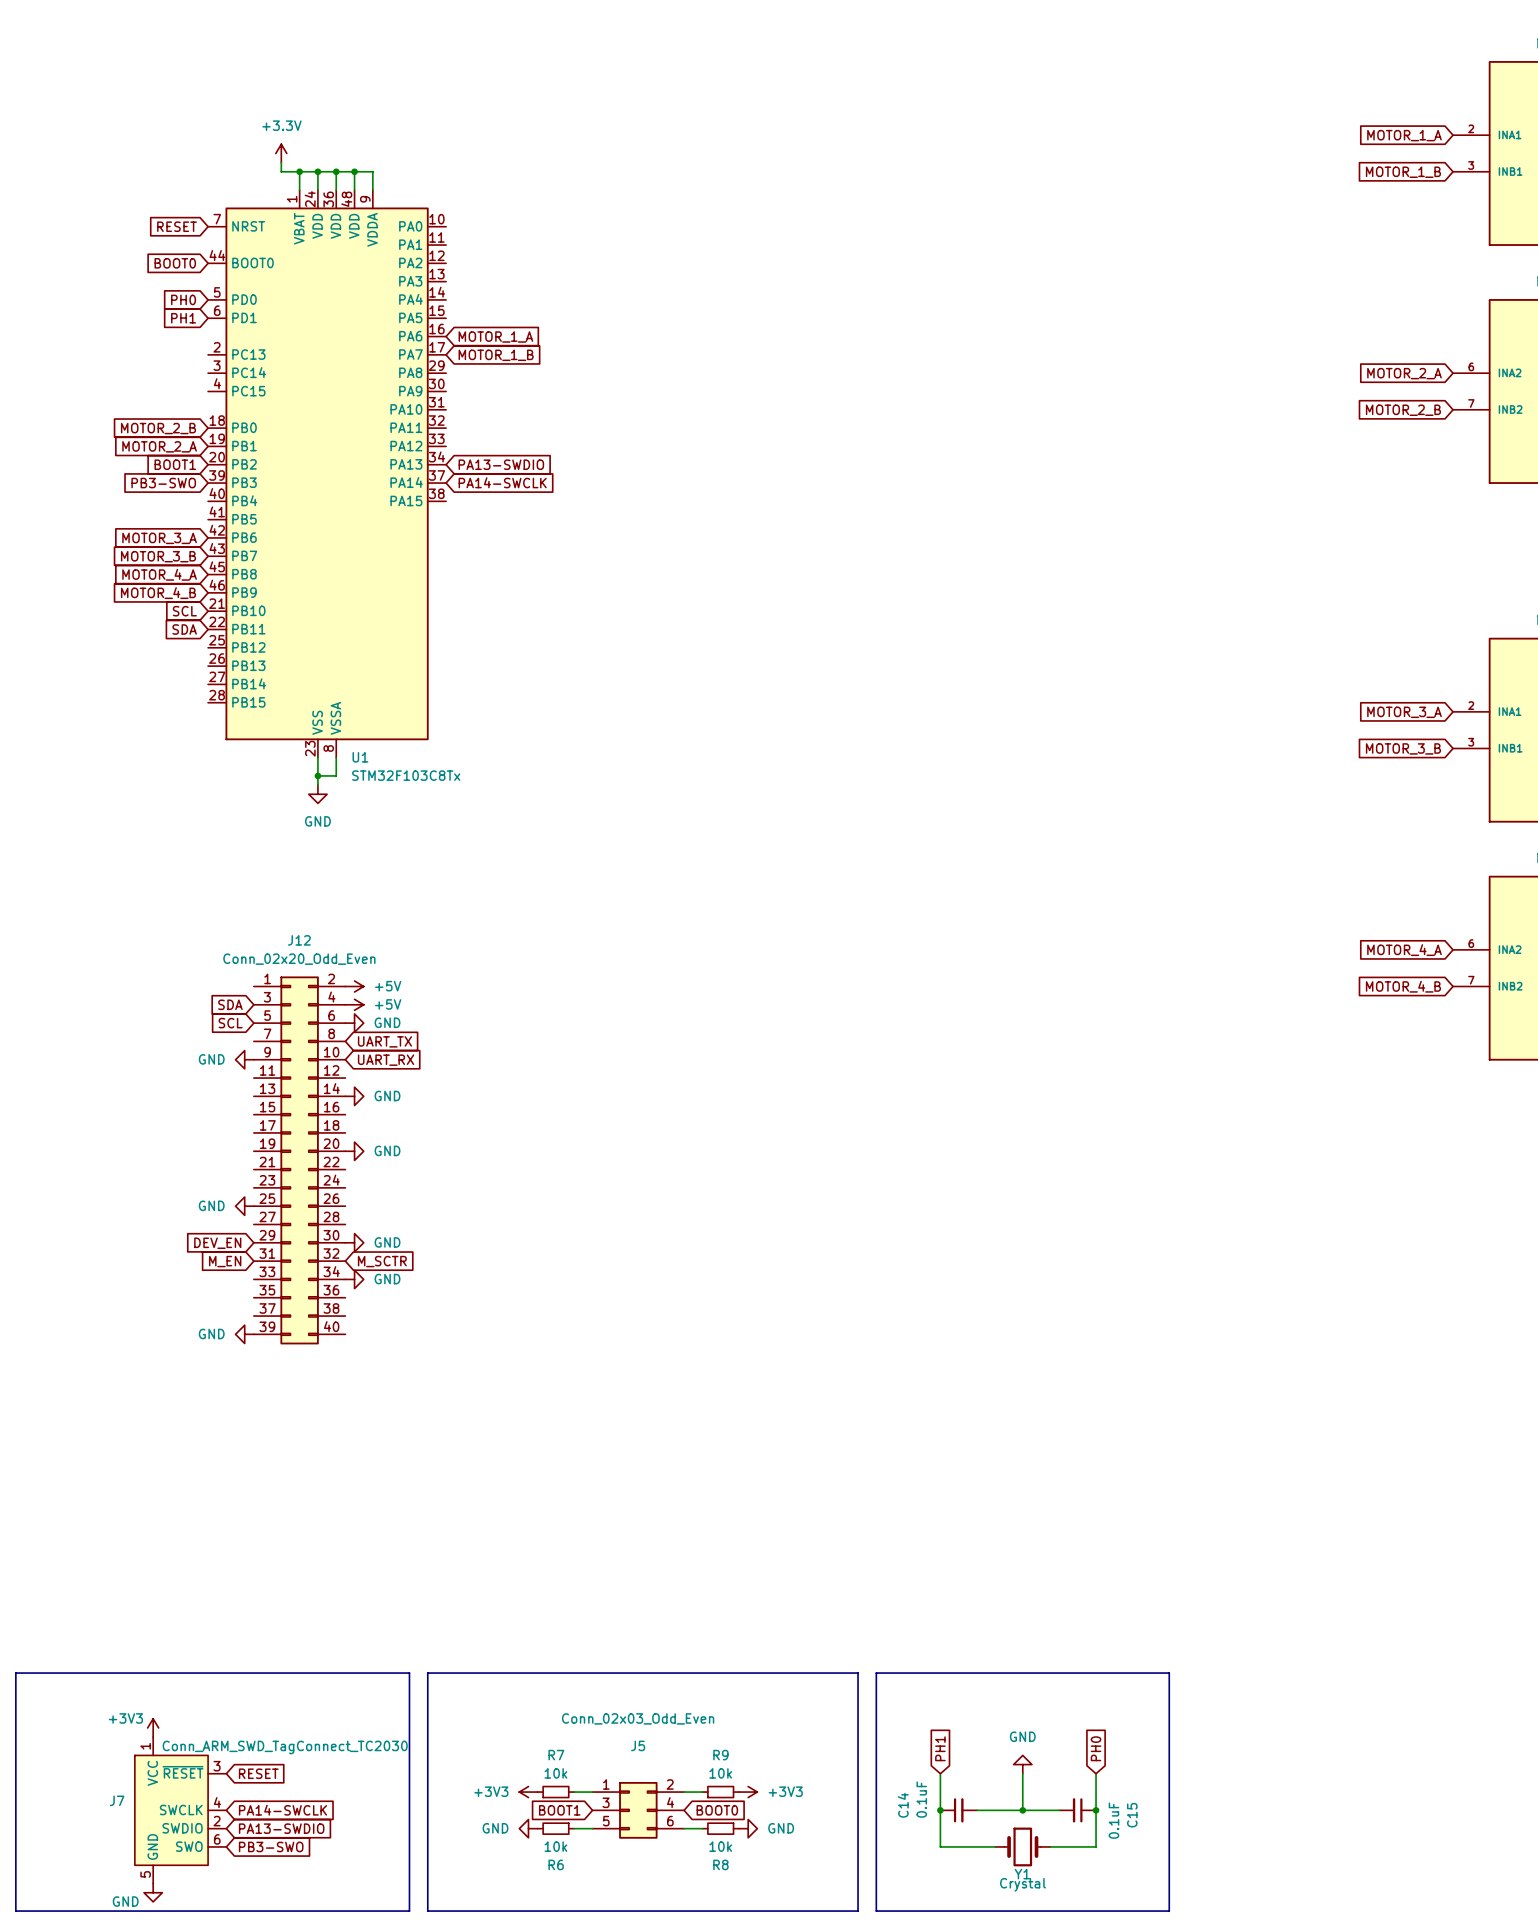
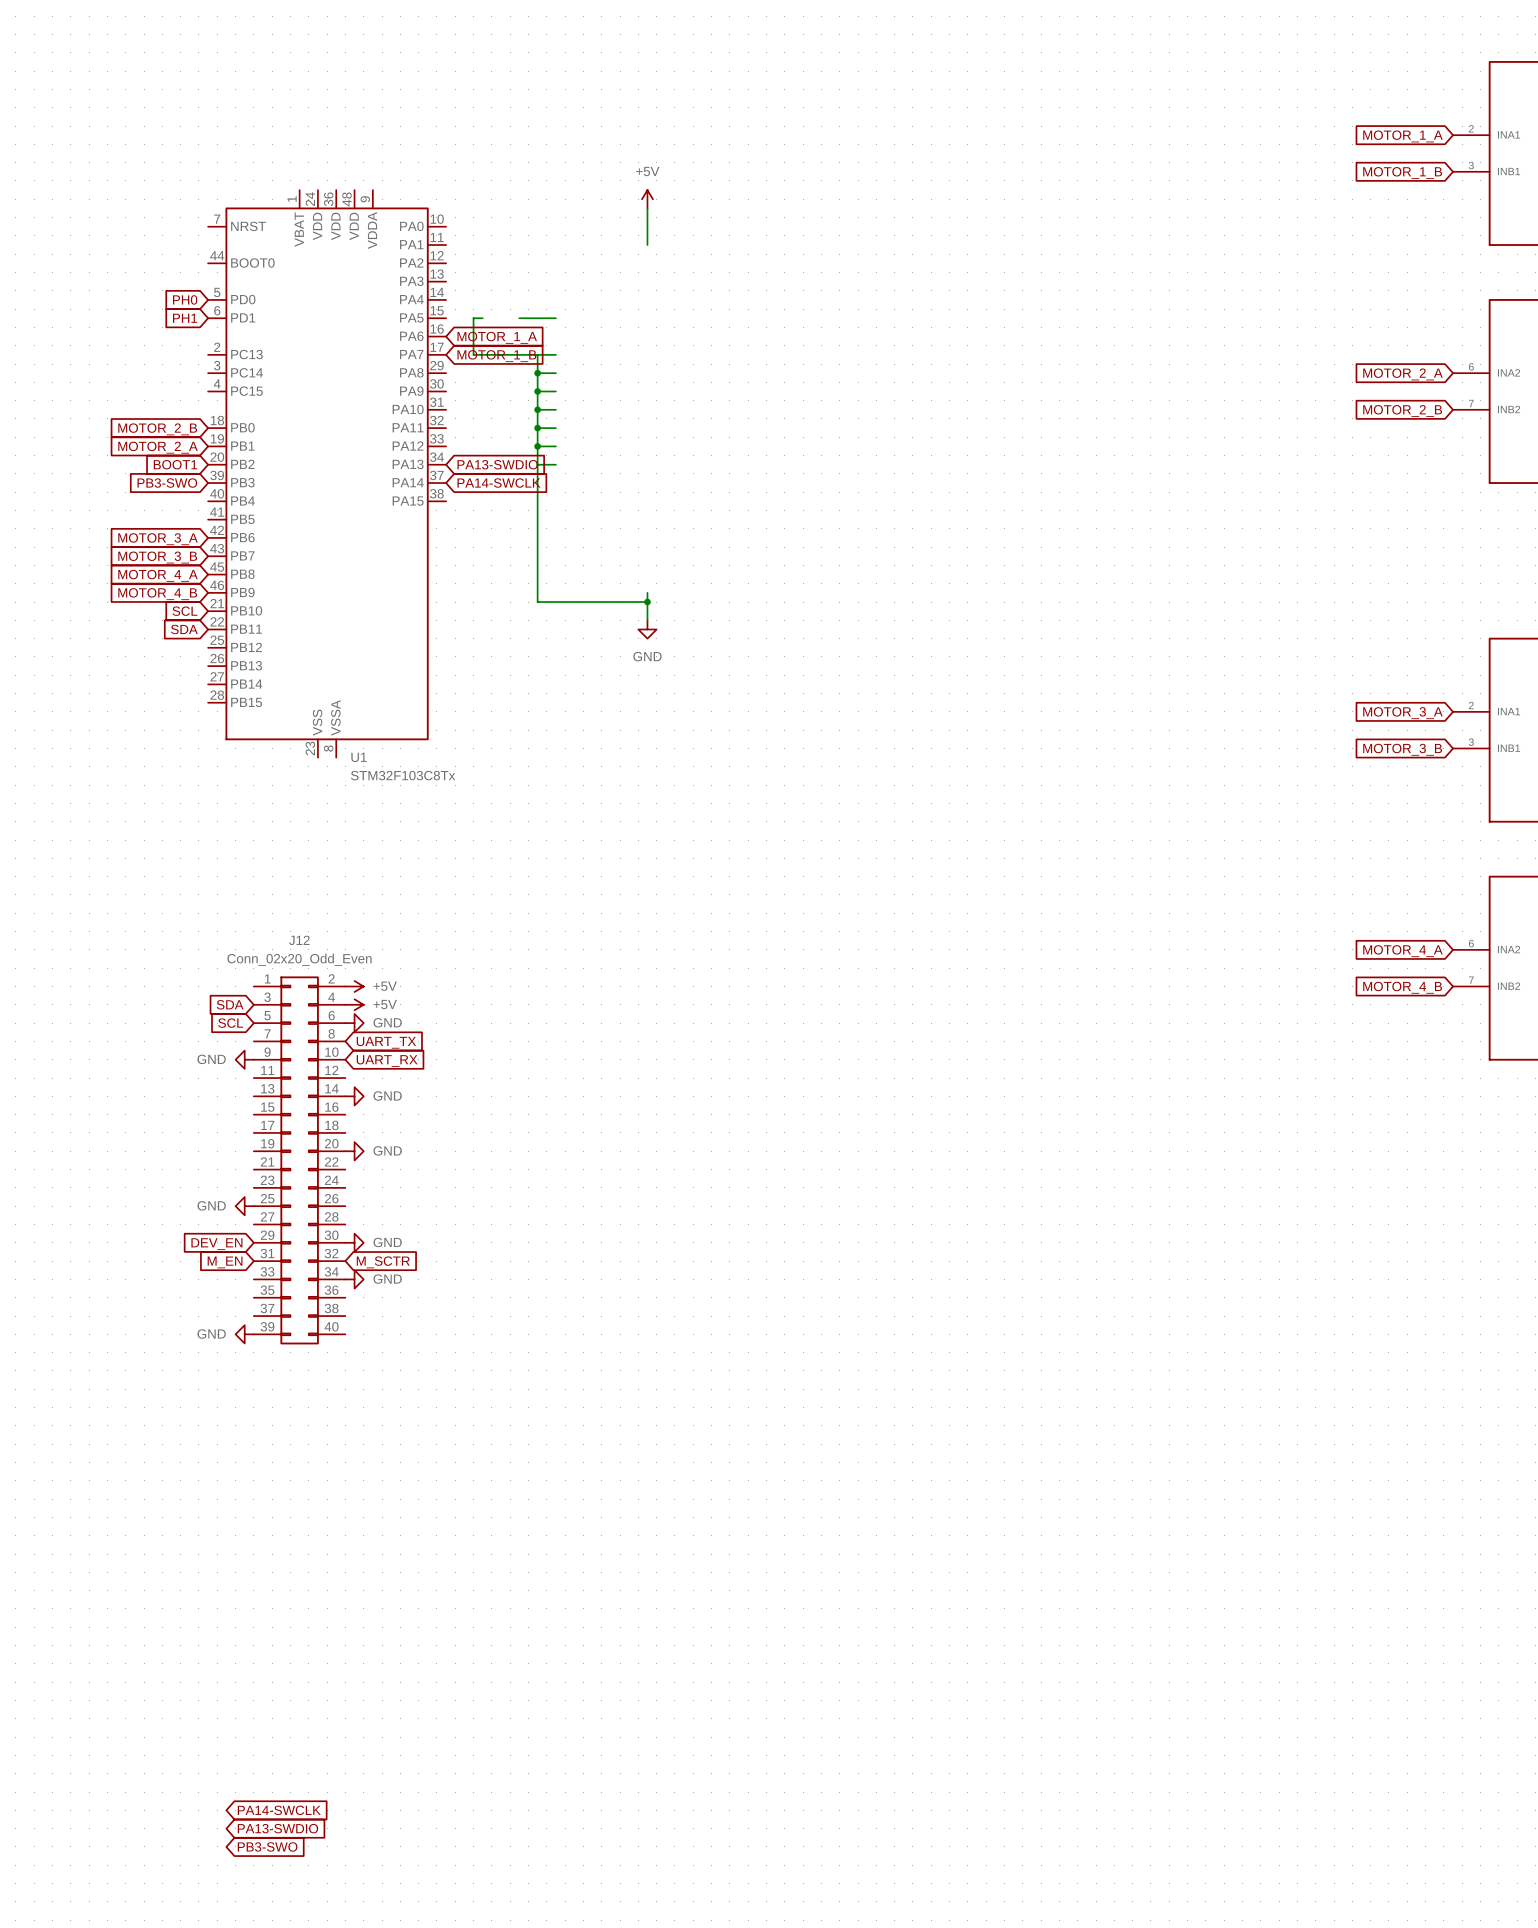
power symbol: +3.3V (281, 153) -> none
wire: (281, 162) (281, 171) (372, 171) (372, 190) -> none
wire: (299, 171) (299, 190) -> none
junction: (299, 171) -> none
wire: (317, 171) (317, 190) -> none
junction: (317, 171) -> none
wire: (336, 171) (336, 190) -> none
junction: (336, 171) -> none
wire: (354, 171) (354, 190) -> none
junction: (354, 171) -> none
power symbol: none -> +5V (647, 199)
wire: none -> (647, 208) (647, 245)
global label: RESET (177, 226) -> none
global label: BOOT0 (175, 263) -> none
wire: none -> (482, 318) (473, 318) (473, 354) (555, 354)
wire: none -> (519, 318) (555, 318)
wire: none -> (537, 354) (537, 602) (647, 602)
wire: none -> (537, 373) (555, 373)
junction: none -> (537, 373)
wire: none -> (537, 391) (555, 391)
junction: none -> (537, 391)
wire: none -> (537, 409) (555, 409)
junction: none -> (537, 409)
wire: none -> (537, 428) (555, 428)
junction: none -> (537, 428)
wire: none -> (537, 446) (555, 446)
junction: none -> (537, 446)
wire: none -> (537, 464) (555, 464)
wire: none -> (647, 592) (647, 620)
junction: none -> (647, 602)
power symbol: none -> GND (647, 629)
wire: (317, 757) (317, 785) -> none
wire: (336, 757) (336, 775) (317, 775) -> none
junction: (317, 775) -> none
power symbol: GND (317, 794) -> none
line: (15, 1673) (409, 1673) (409, 1911) (15, 1911) (15, 1673) -> none
line: (427, 1673) (858, 1673) (858, 1911) (427, 1911) (427, 1673) -> none
line: (876, 1673) (1169, 1673) (1169, 1911) (876, 1911) (876, 1673) -> none
power symbol: +3V3 (153, 1727) -> none
global label: PH1 (940, 1748) -> none
global label: PH0 (1096, 1748) -> none
power symbol: GND (1022, 1764) -> none
global label: RESET (258, 1773) -> none
wire: (940, 1773) (940, 1846) (995, 1846) -> none
wire: (1022, 1773) (1022, 1810) -> none
wire: (1096, 1773) (1096, 1846) (1050, 1846) -> none
power symbol: +3V3 (528, 1792) -> none
R7: 10k (555, 1792) -> none
wire: (574, 1792) (592, 1792) -> none
wire: (684, 1792) (702, 1792) -> none
R9: 10k (720, 1792) -> none
power symbol: +3V3 (748, 1792) -> none
J7: Conn_ARM_SWD_TagConnect_TC2030 (180, 1810) -> none
global label: BOOT1 (559, 1810) -> none
J5: Conn_02x03_Odd_Even (638, 1810) -> none
global label: BOOT0 (717, 1810) -> none
junction: (940, 1810) -> none
C14: 0.1uF (958, 1810) -> none
wire: (977, 1810) (1059, 1810) -> none
junction: (1022, 1810) -> none
C15: 0.1uF (1077, 1810) -> none
junction: (1096, 1810) -> none
power symbol: GND (528, 1828) -> none
R6: 10k (555, 1828) -> none
wire: (574, 1828) (592, 1828) -> none
wire: (684, 1828) (702, 1828) -> none
R8: 10k (720, 1828) -> none
power symbol: GND (748, 1828) -> none
Y1: Crystal (1022, 1846) -> none
power symbol: GND (153, 1892) -> none

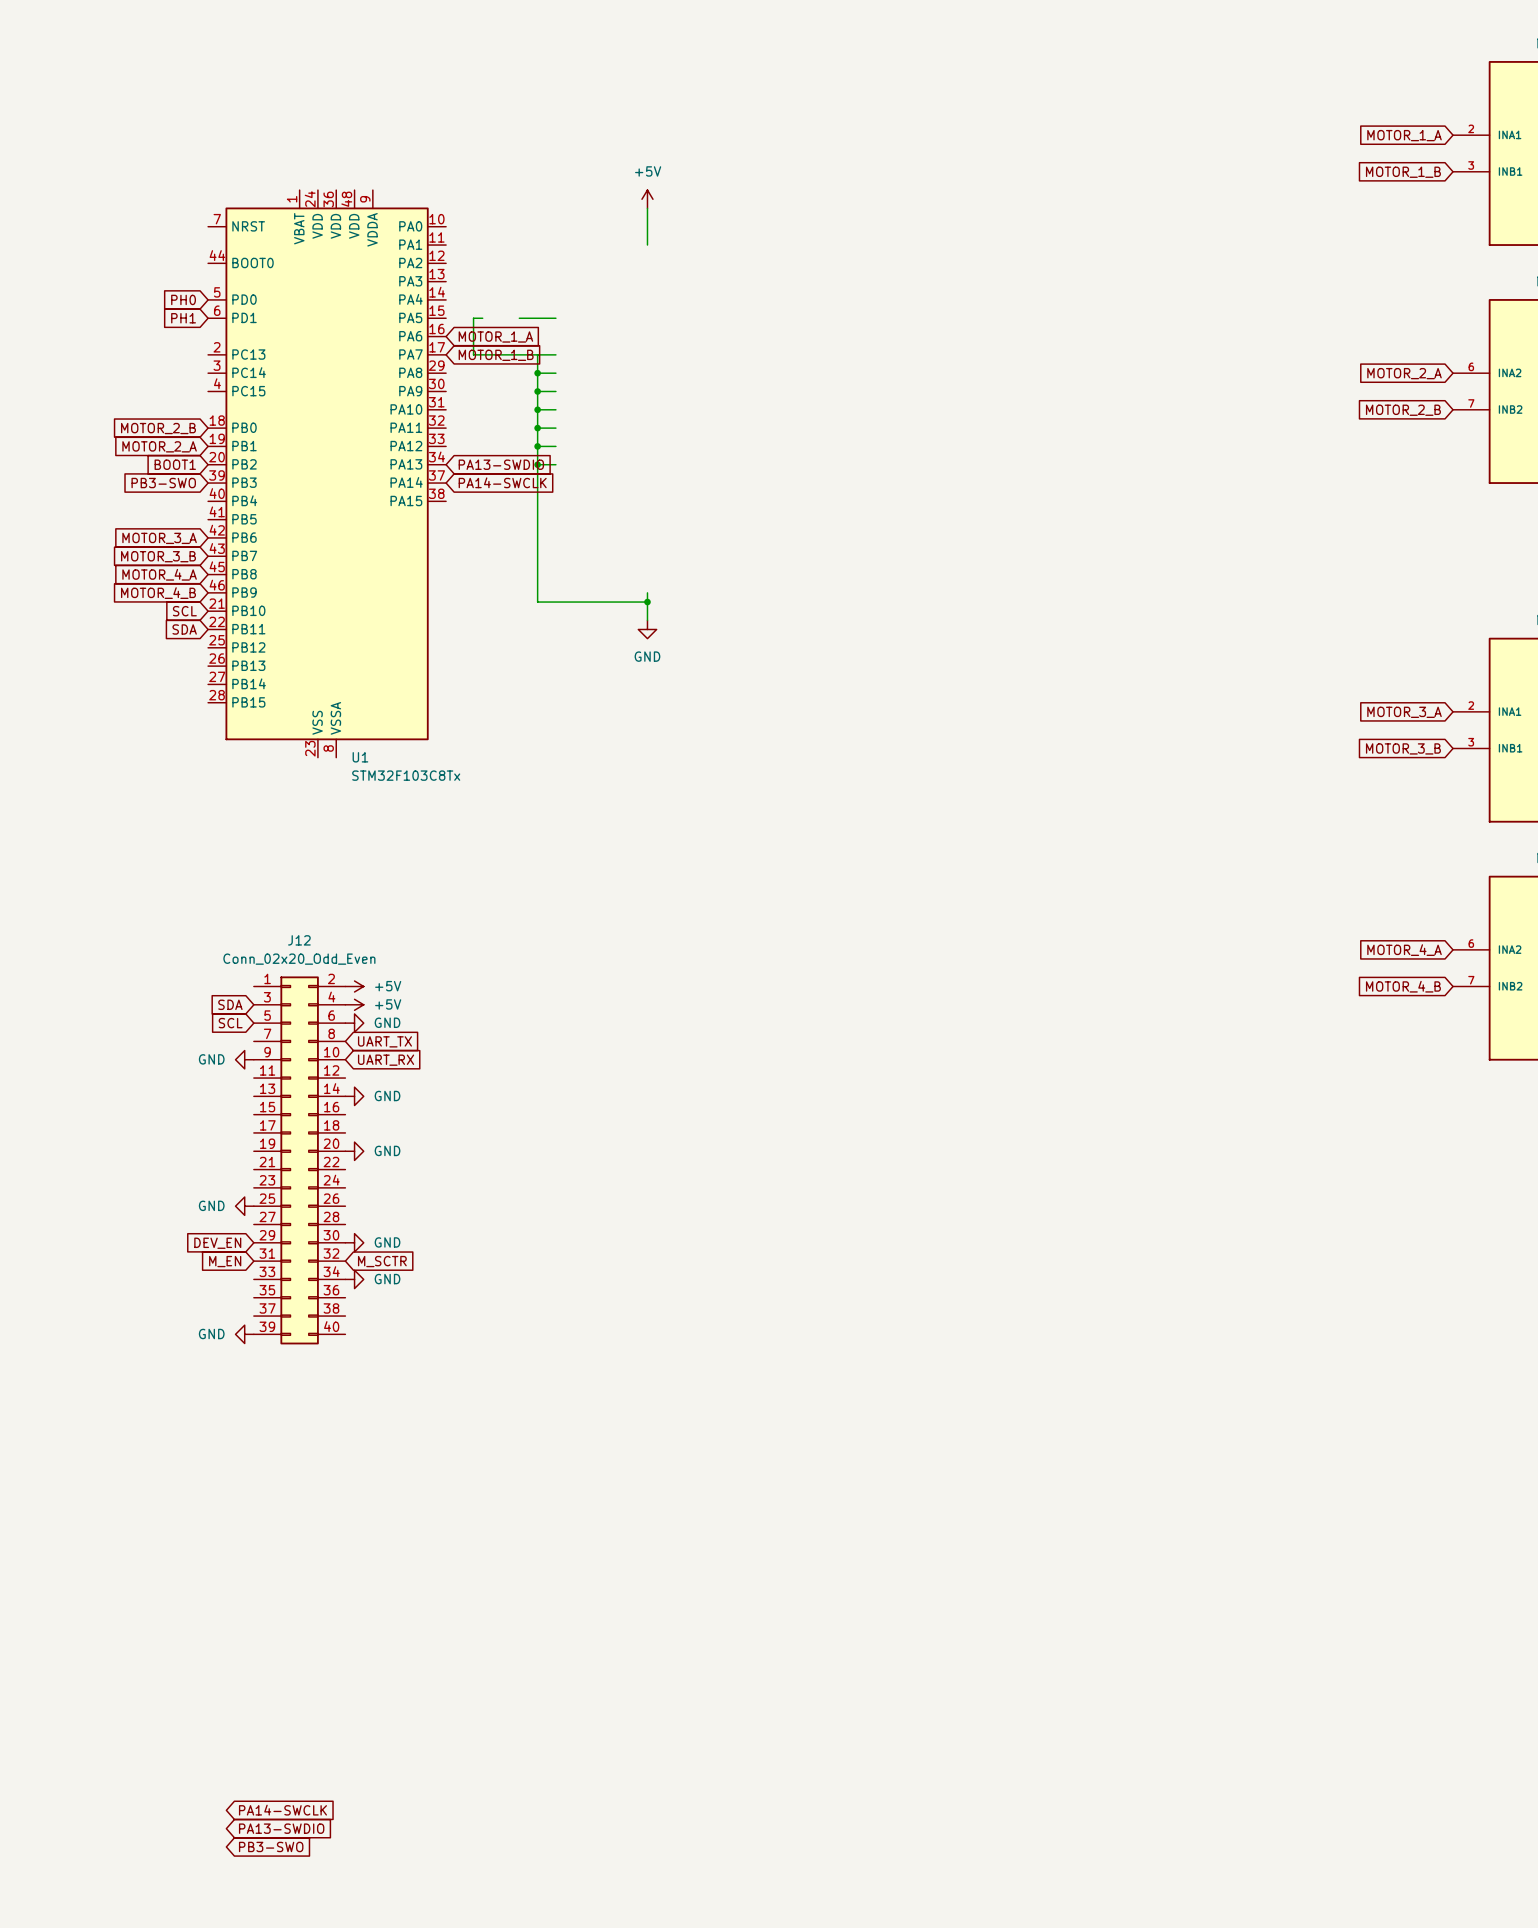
junction: none -> (537, 464)

